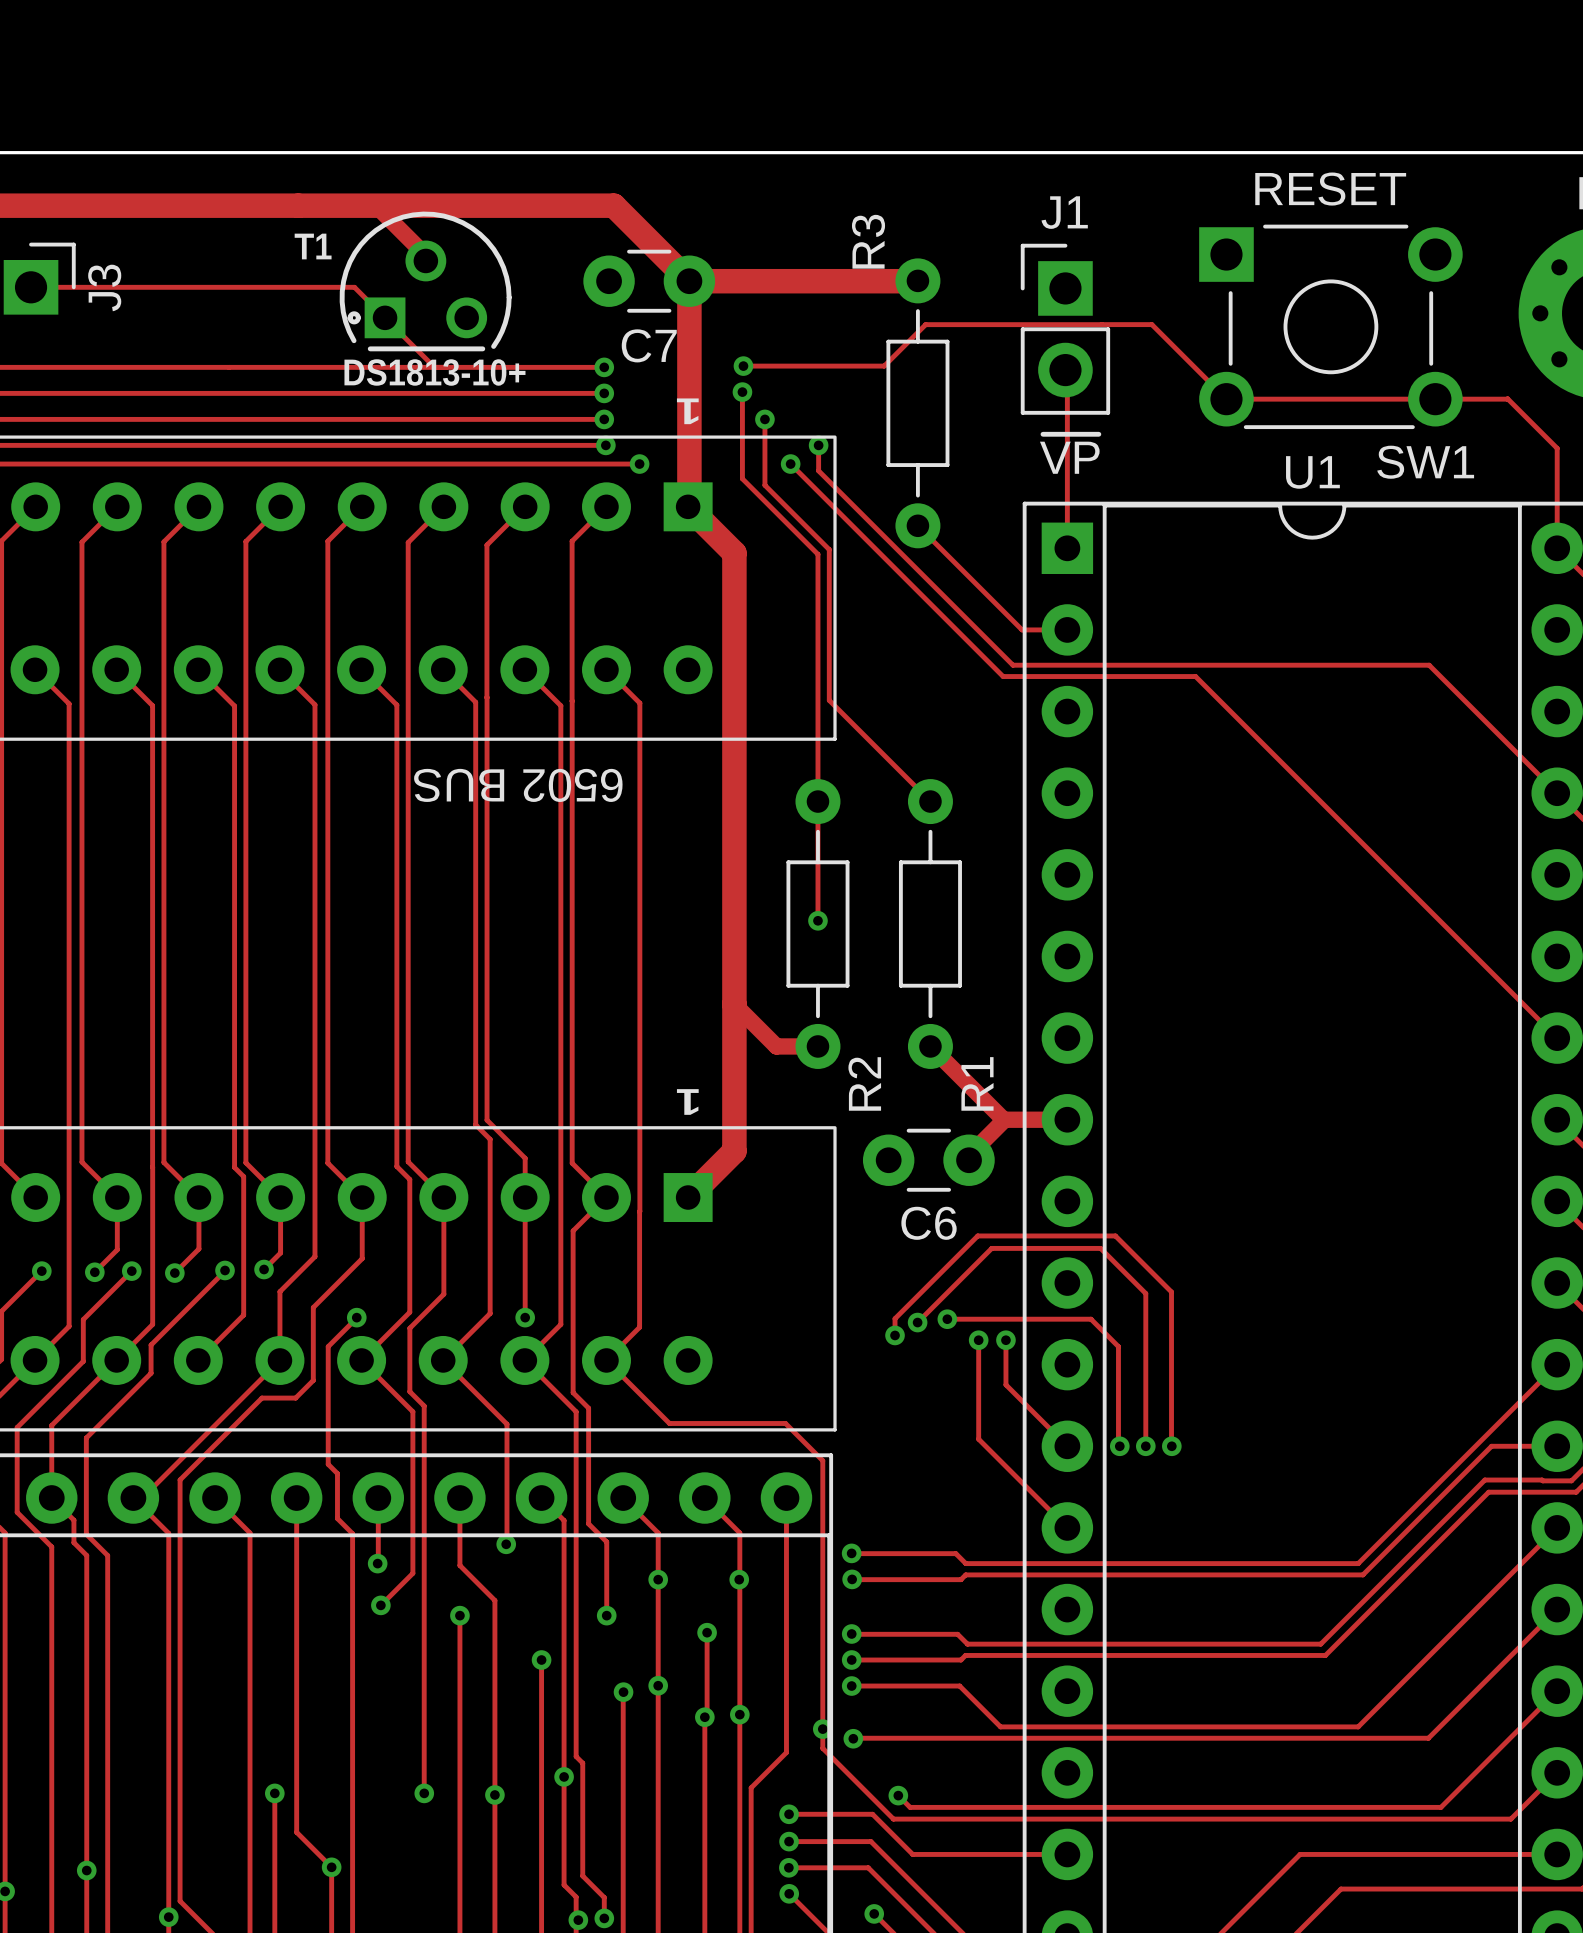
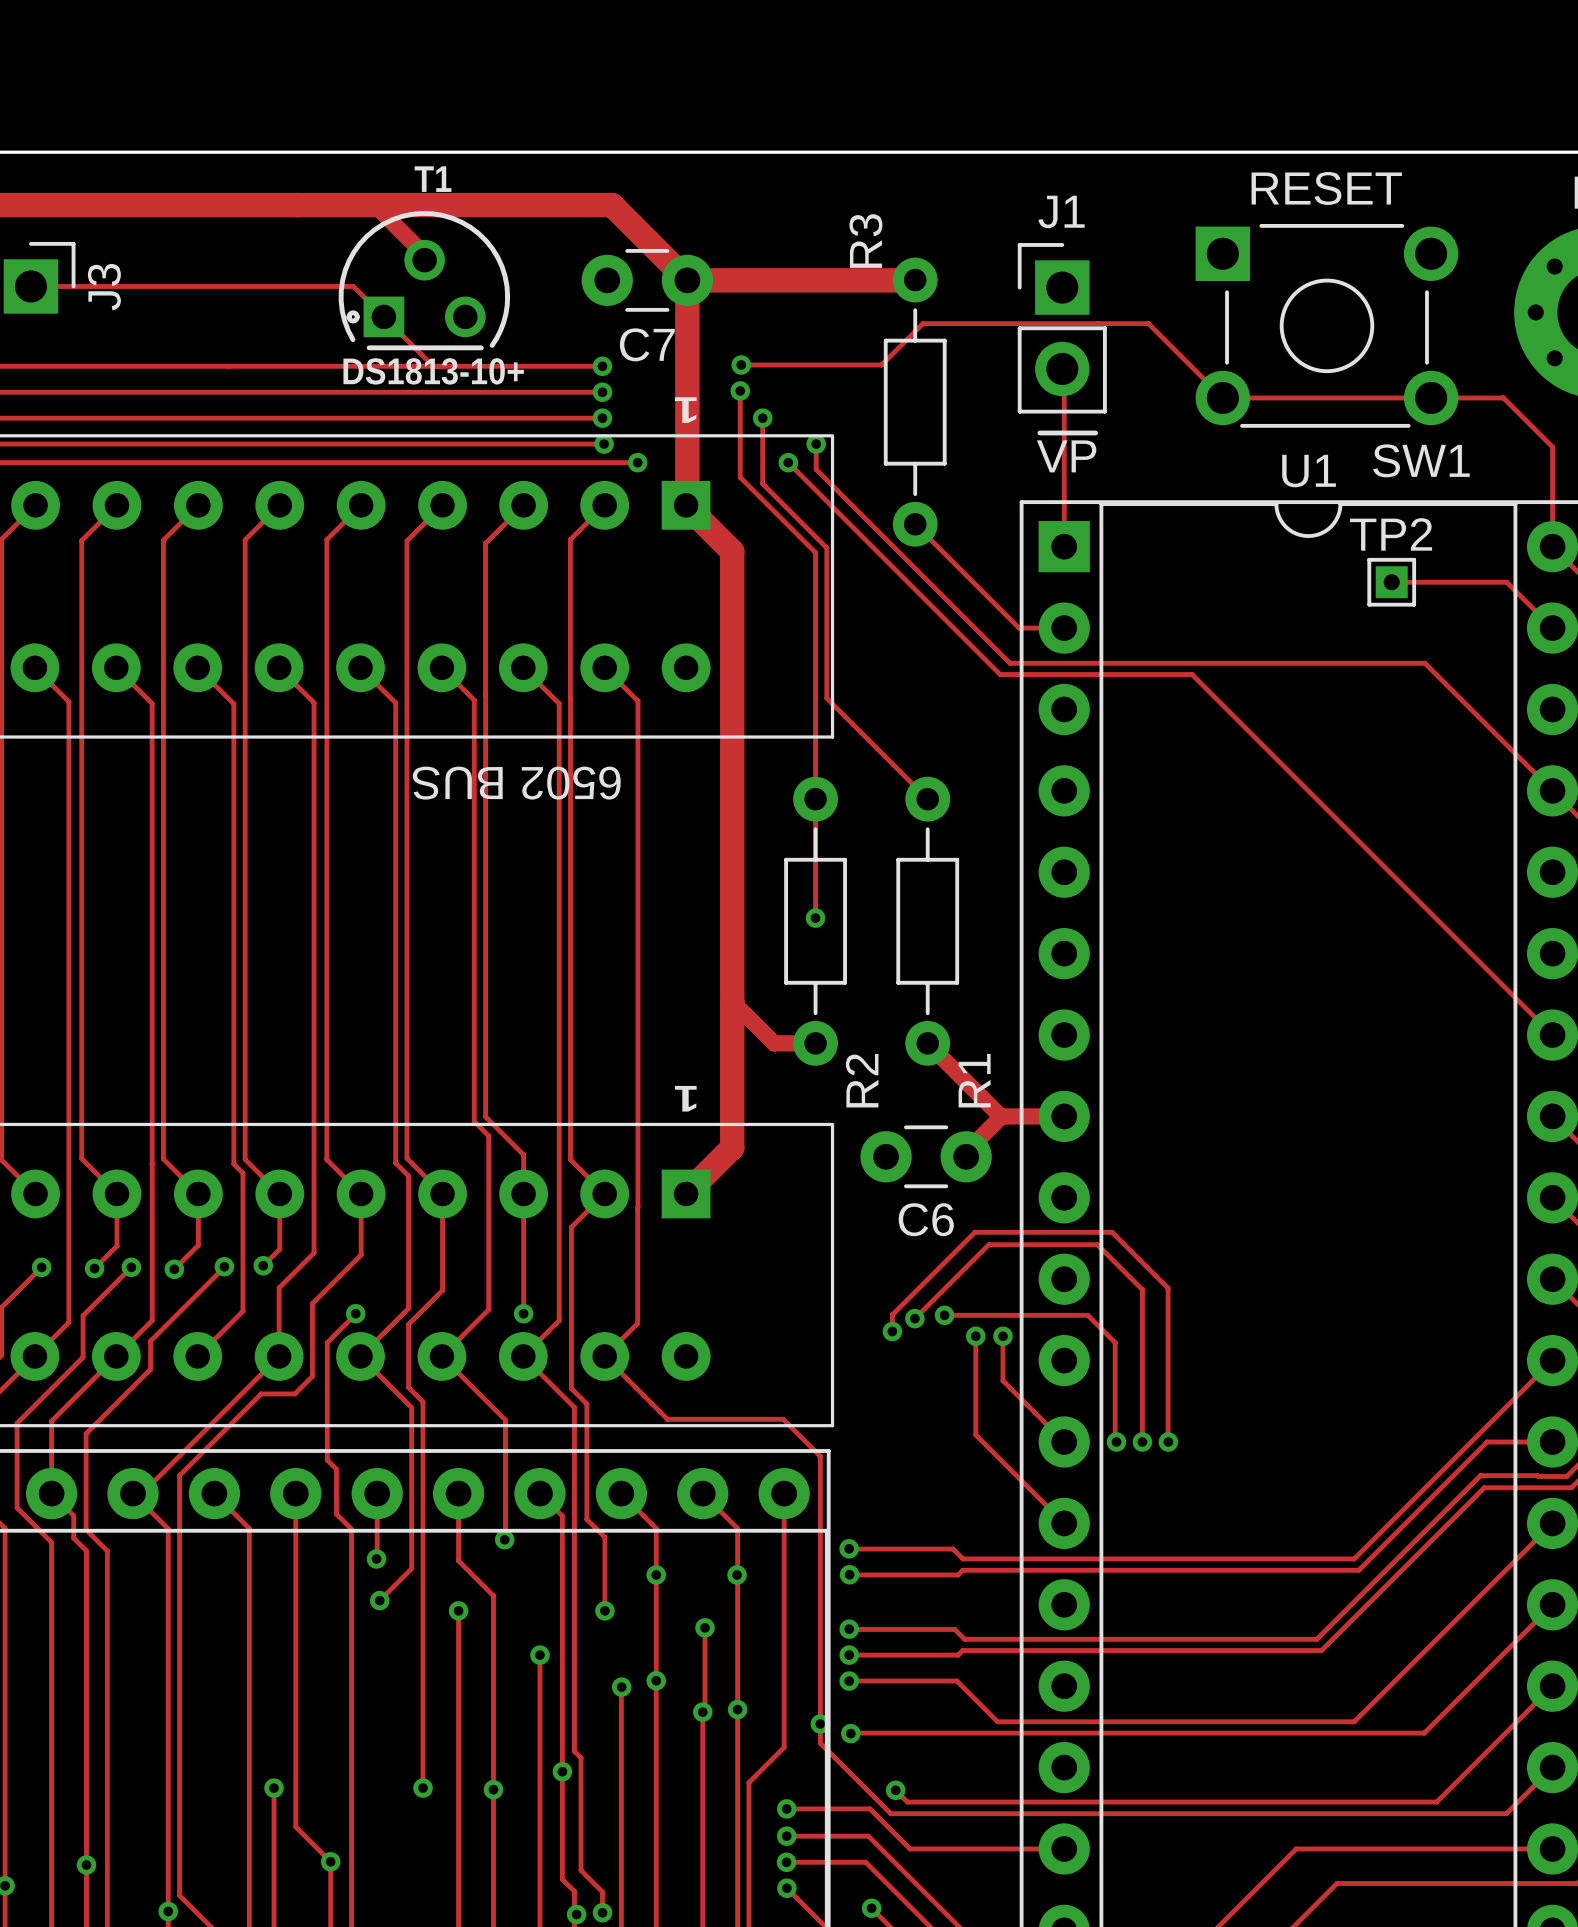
T1 name position: T1 (313, 246) -> T1 (432, 179)
track: none -> (1391, 582) (1506, 582) (1552, 628)
TP2: none -> (1391, 582)

